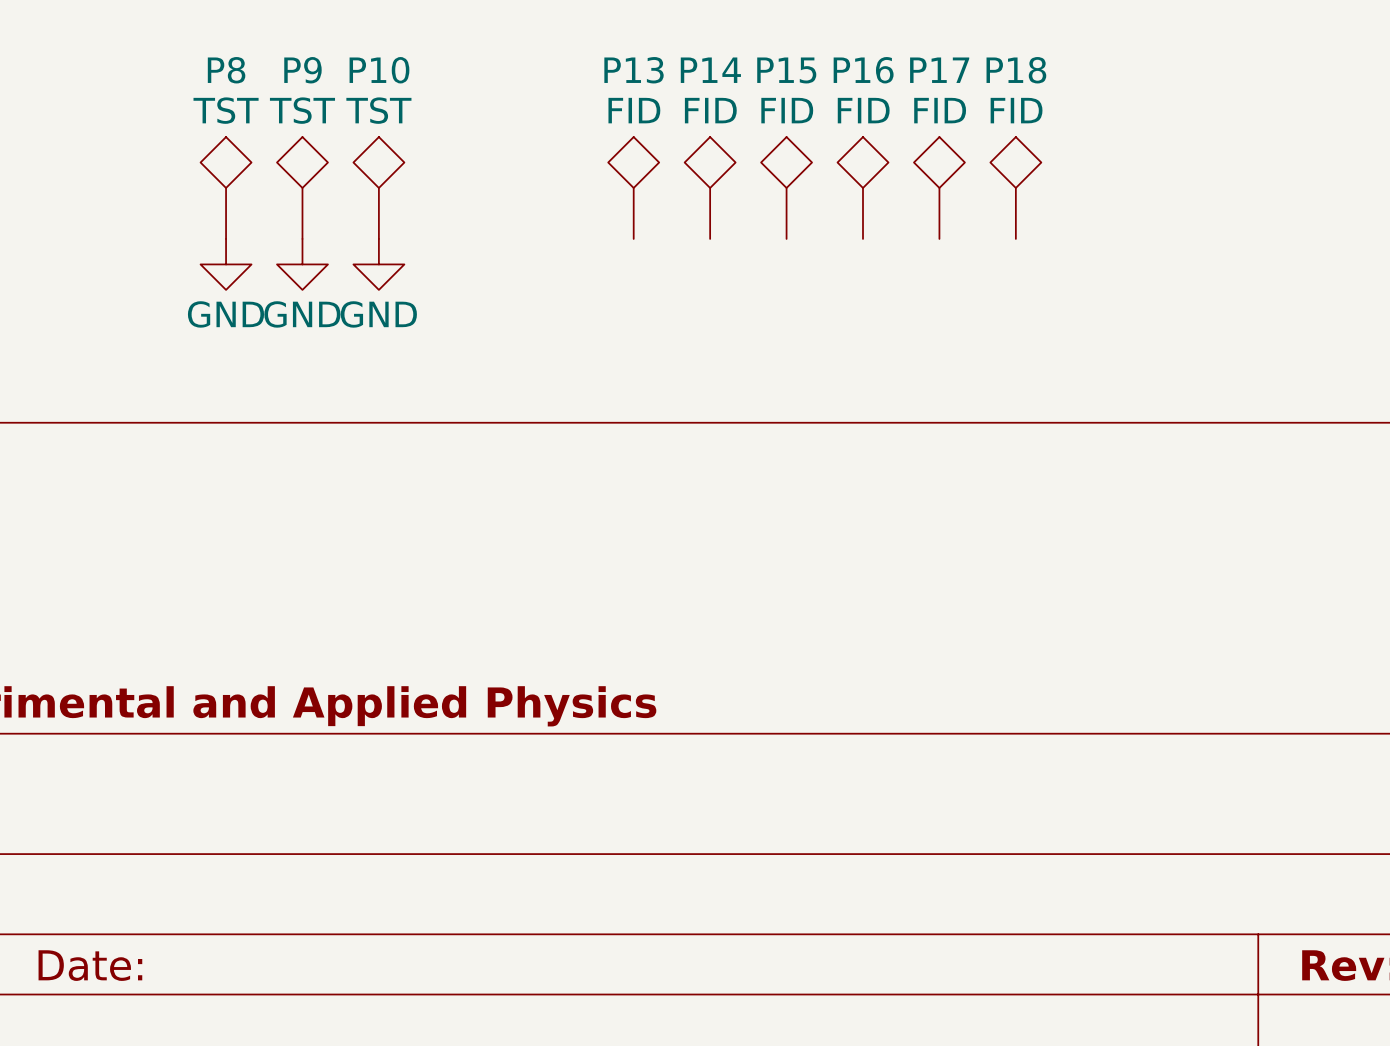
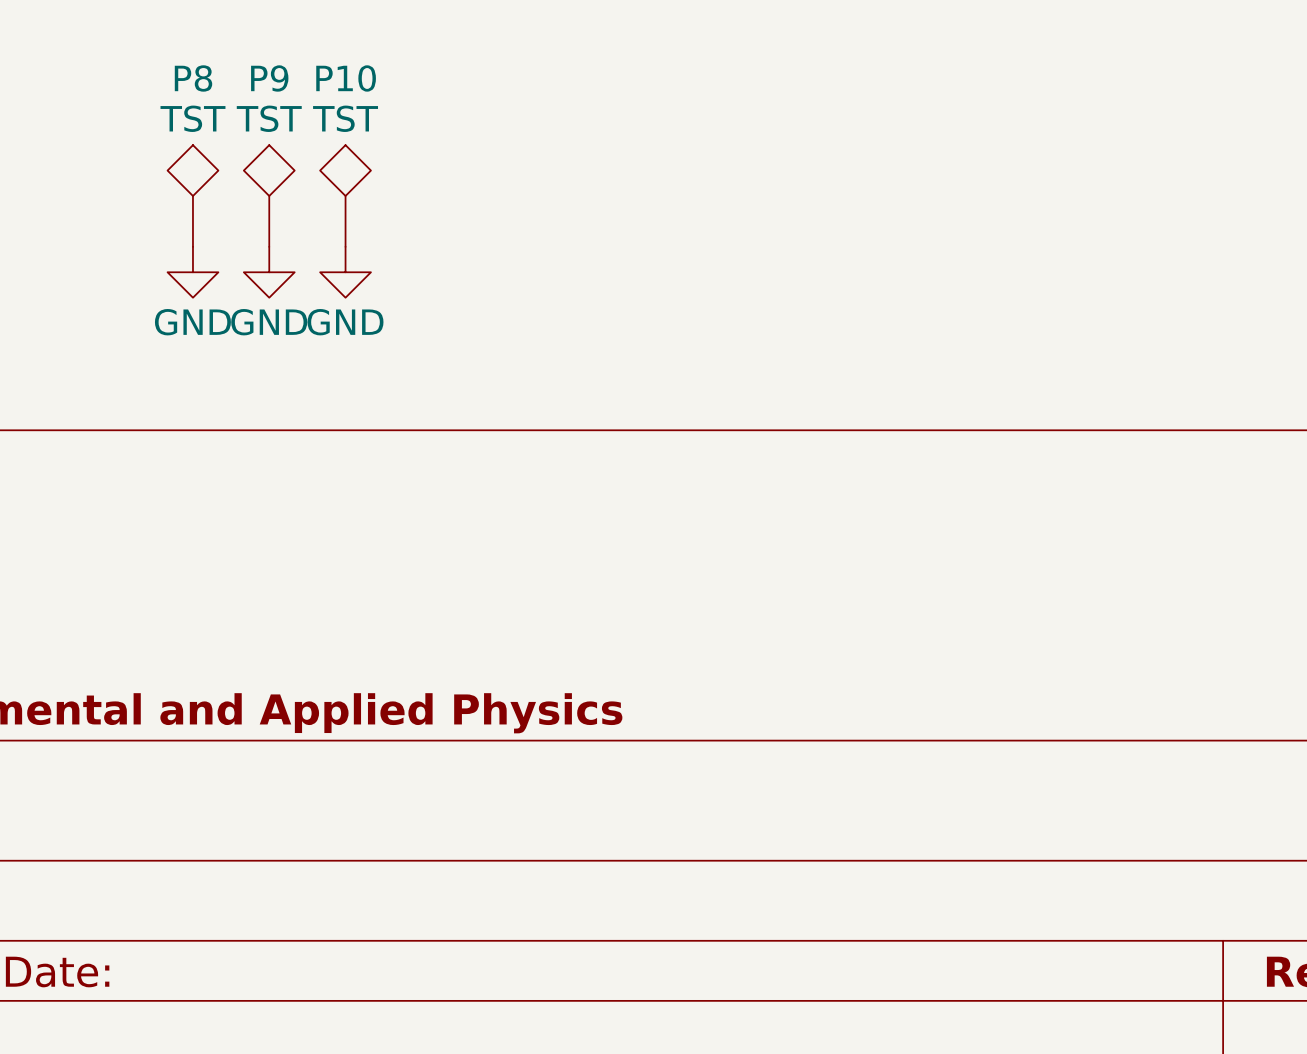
P13: FID (633, 187) -> none
P14: FID (710, 187) -> none
P15: FID (786, 187) -> none
P16: FID (863, 187) -> none
P17: FID (939, 187) -> none
P18: FID (1015, 187) -> none

